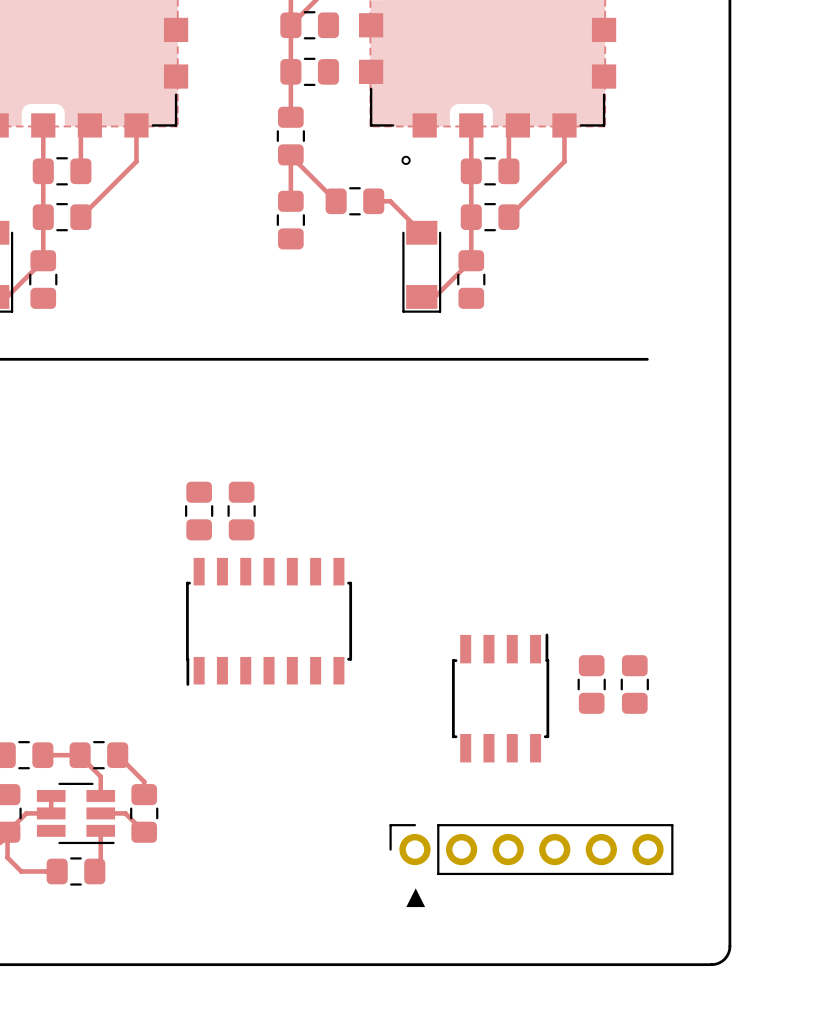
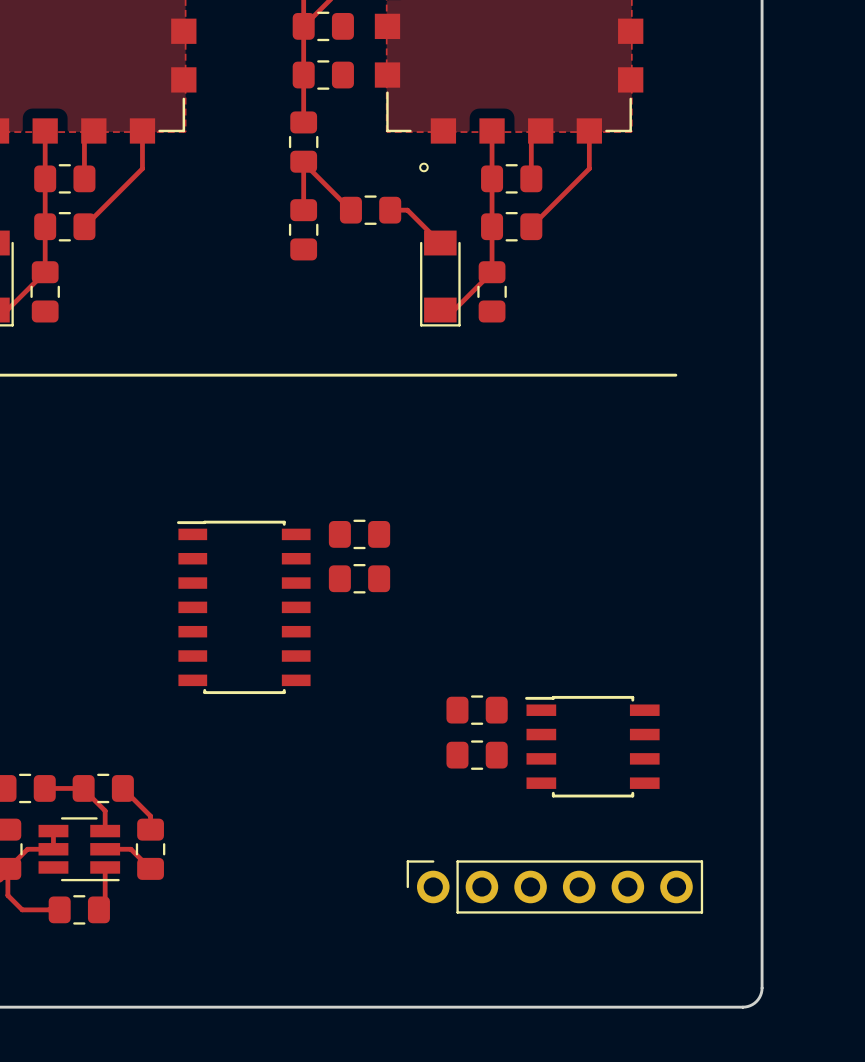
part: (199, 511) -> none
part: (241, 511) -> none
part: none -> (359, 534)
part: none -> (359, 578)
part rotation: 0° (269, 621) -> 90° clockwise (243, 607)
part: none -> (477, 710)
part: (591, 684) -> none
part: (634, 684) -> none
part rotation: 0° (500, 697) -> 90° counterclockwise (592, 746)
part: none -> (477, 755)
text: ▸ (415, 897) -> none

